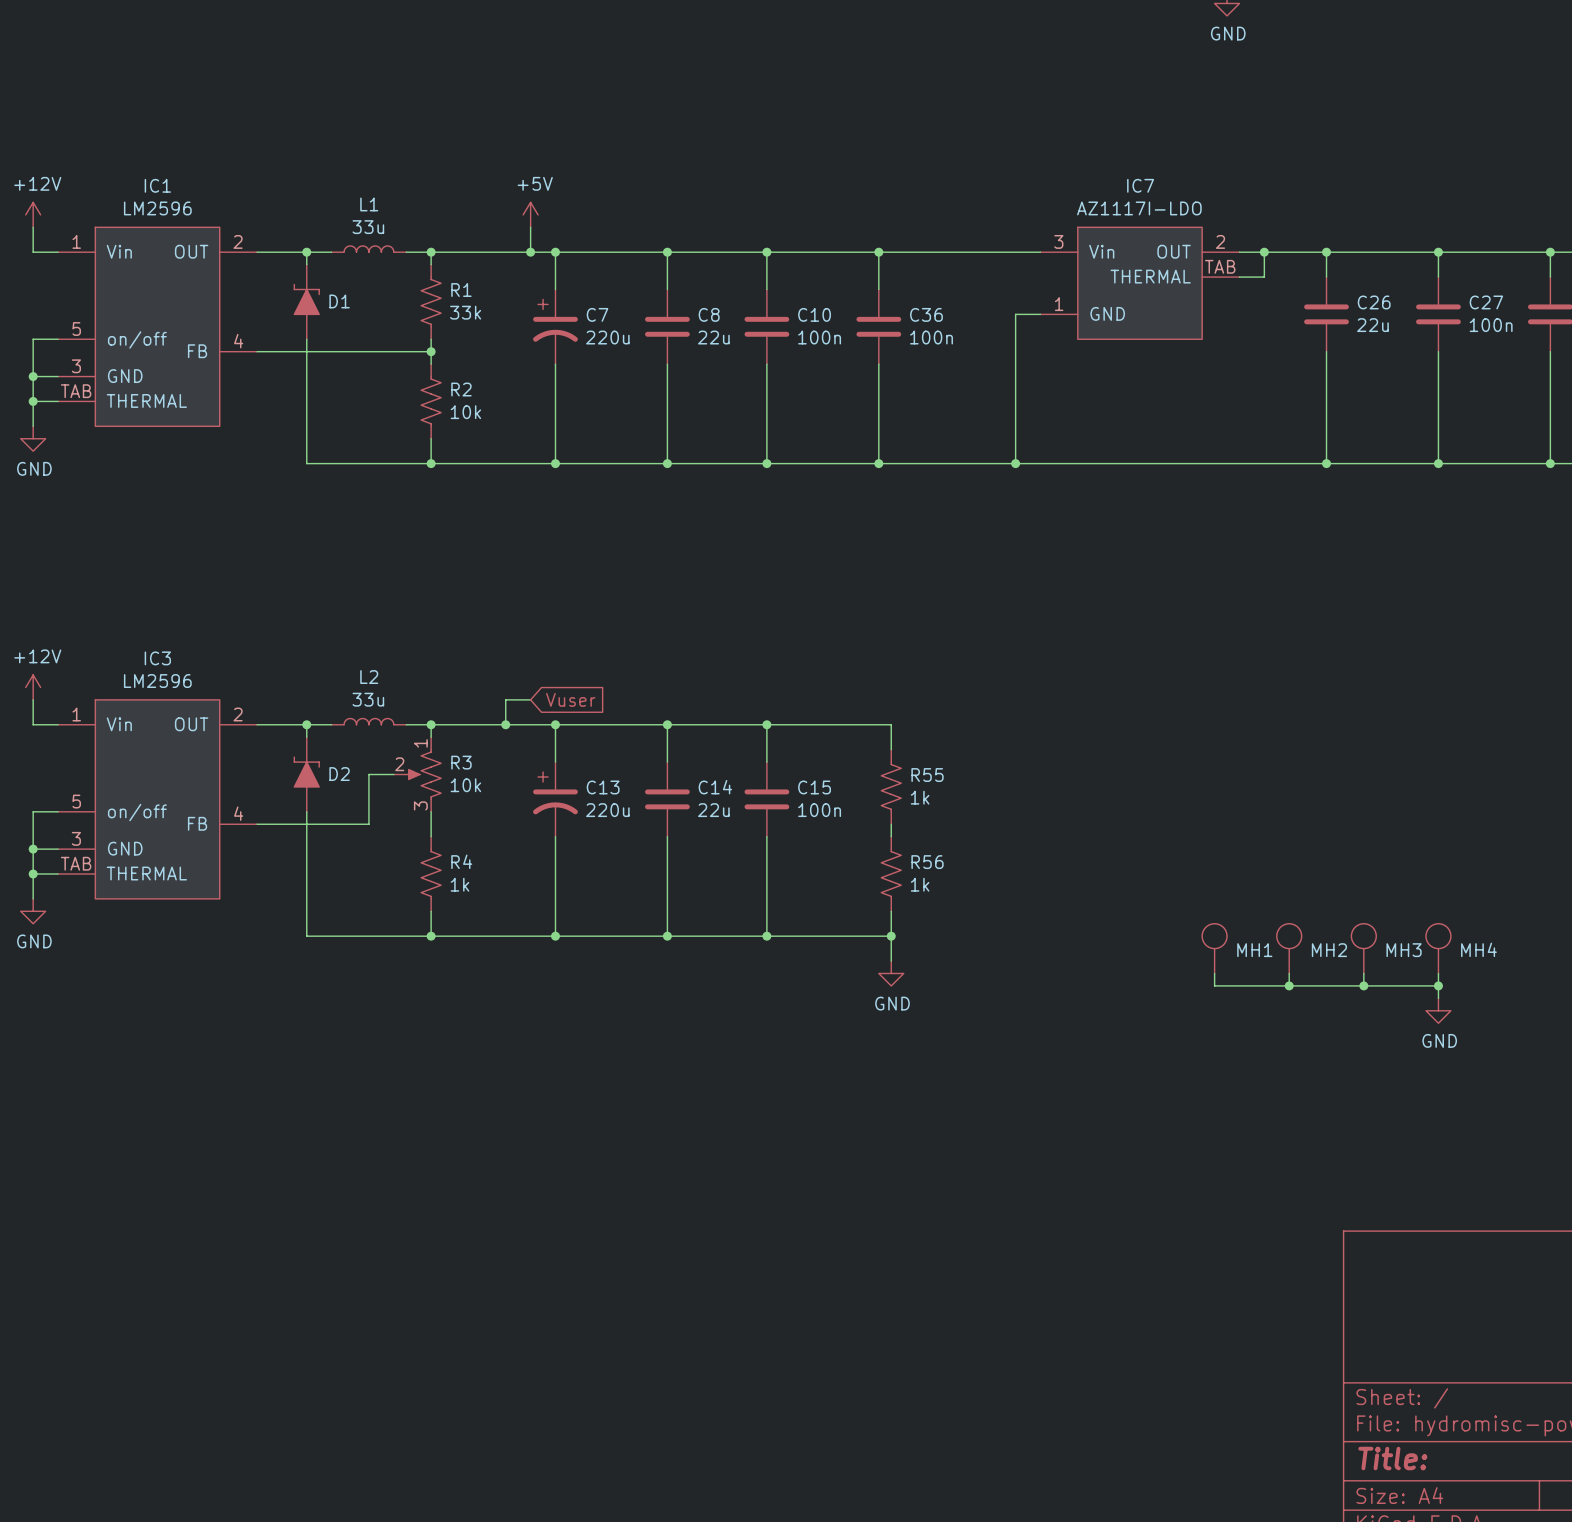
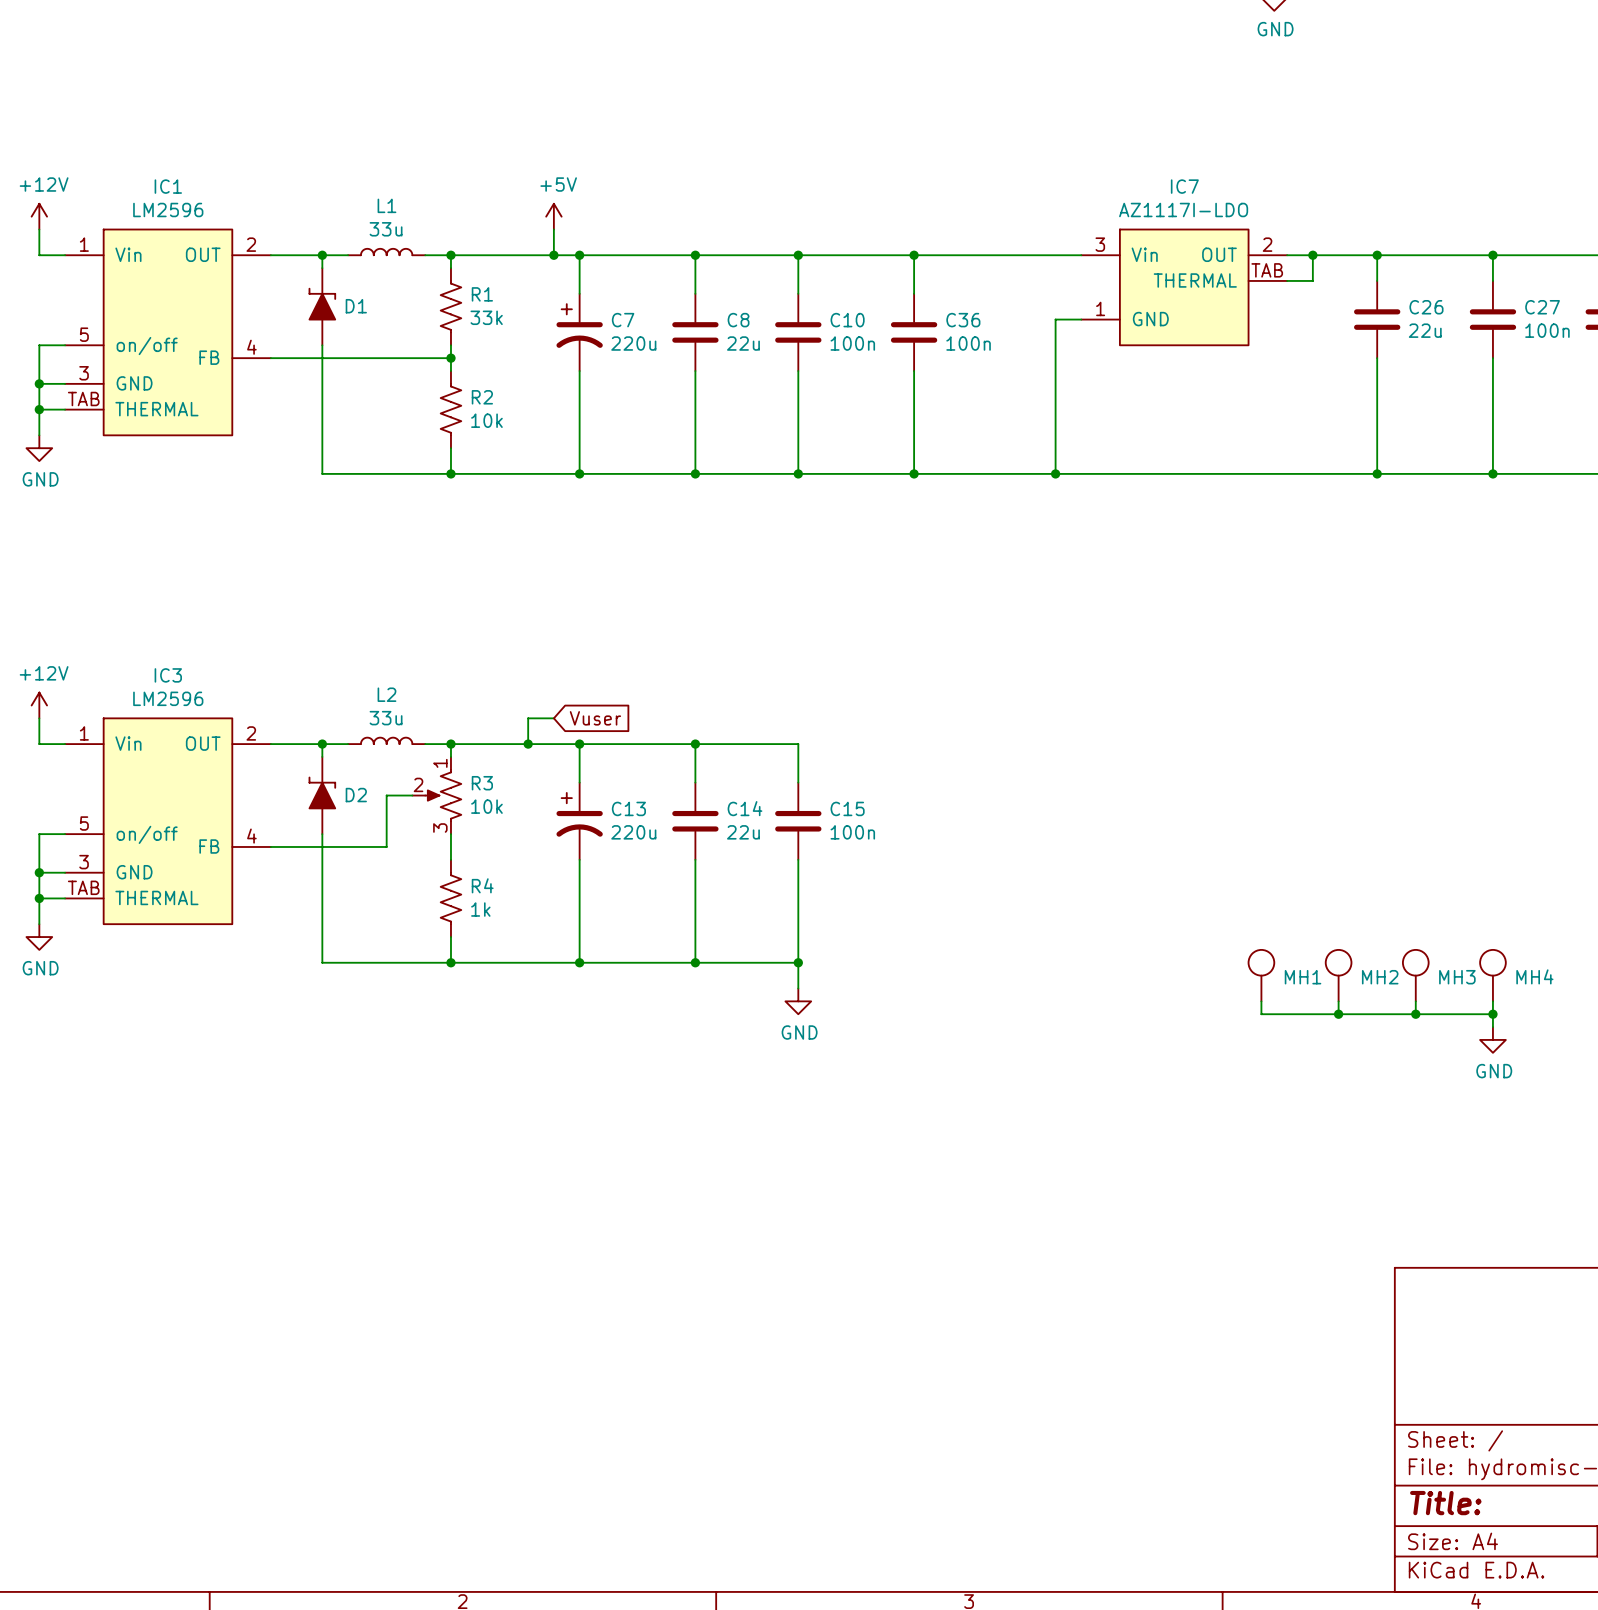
wire: (766, 724) (891, 724) (891, 749) -> none
junction: (766, 724) -> none
R55: 1k (891, 786) -> none
wire: (891, 824) (891, 836) -> none
R56: 1k (891, 874) -> none
wire: (891, 911) (891, 961) -> none
wire: (766, 936) (891, 936) -> (798, 962) (798, 988)
junction: (891, 936) -> none
power symbol position: GND (891, 973) -> GND (798, 1001)

